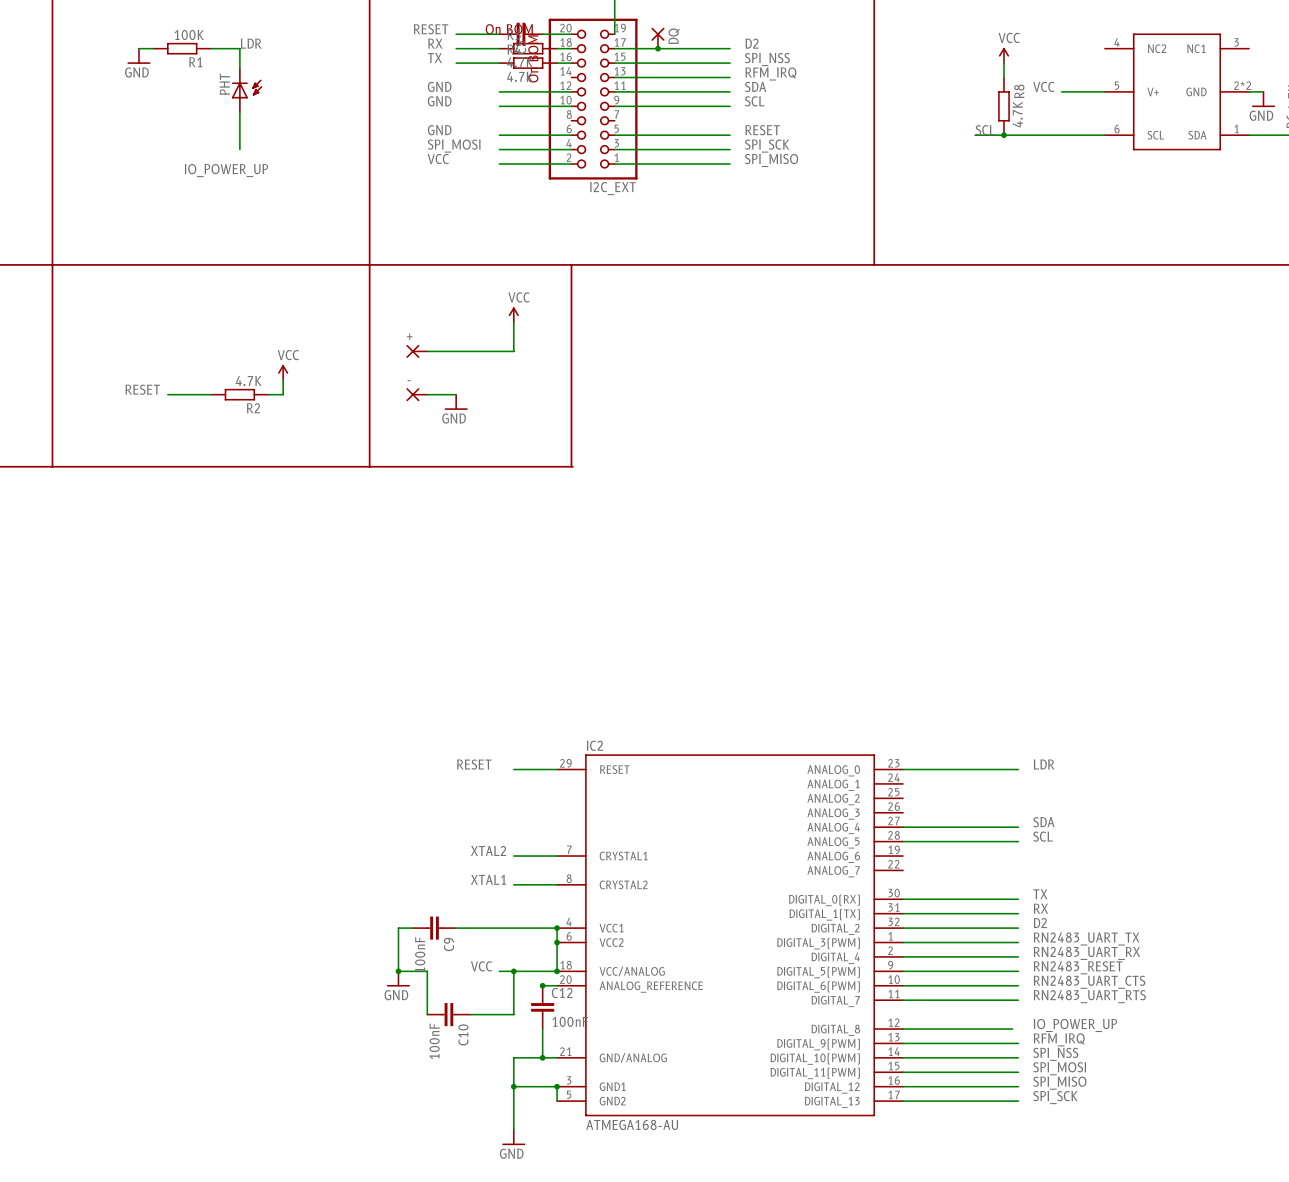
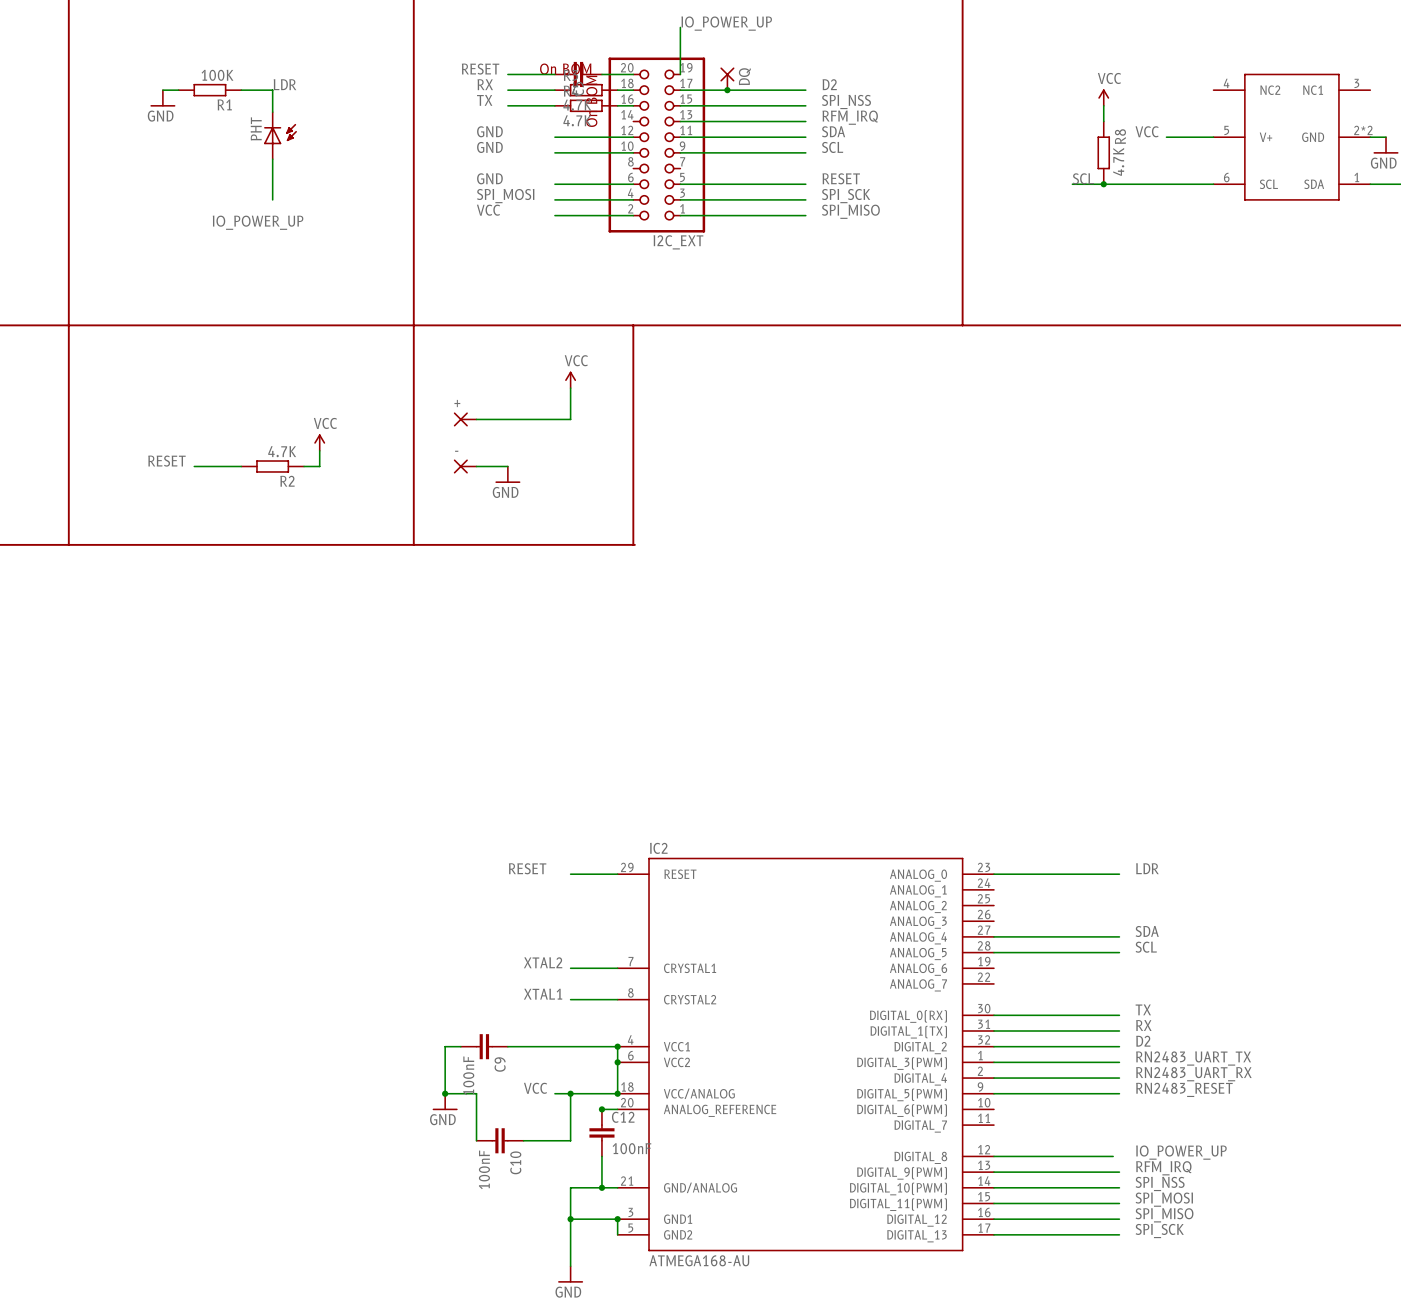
label: RN2483_UART_CTS (1089, 982) -> none
wire: (903, 985) (1018, 985) -> none
label: RN2483_UART_RTS (1089, 996) -> none
wire: (903, 1000) (1018, 1000) -> none

